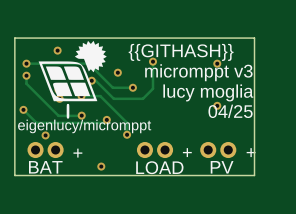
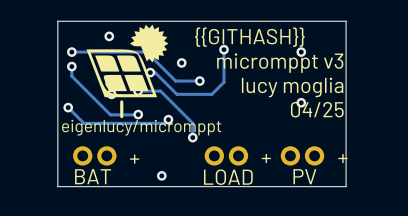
via: (45, 135) -> none

